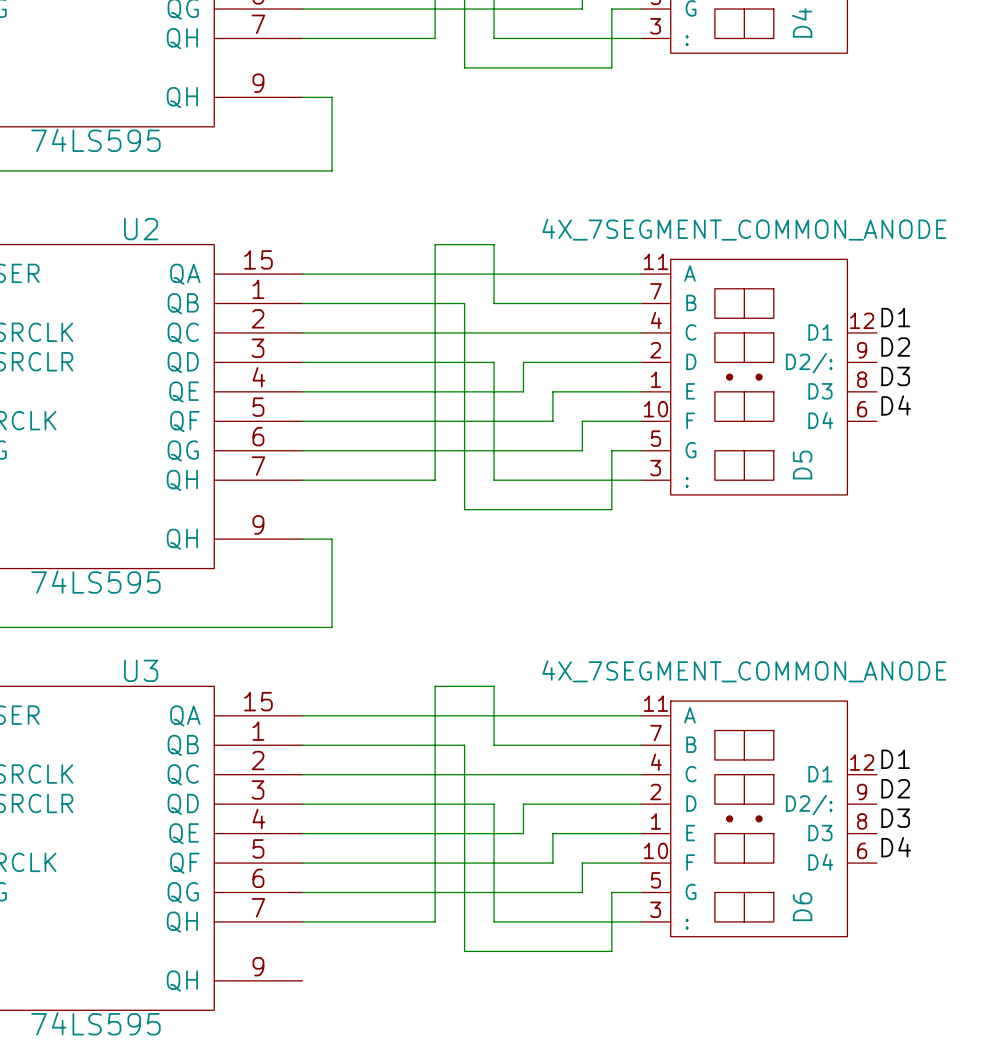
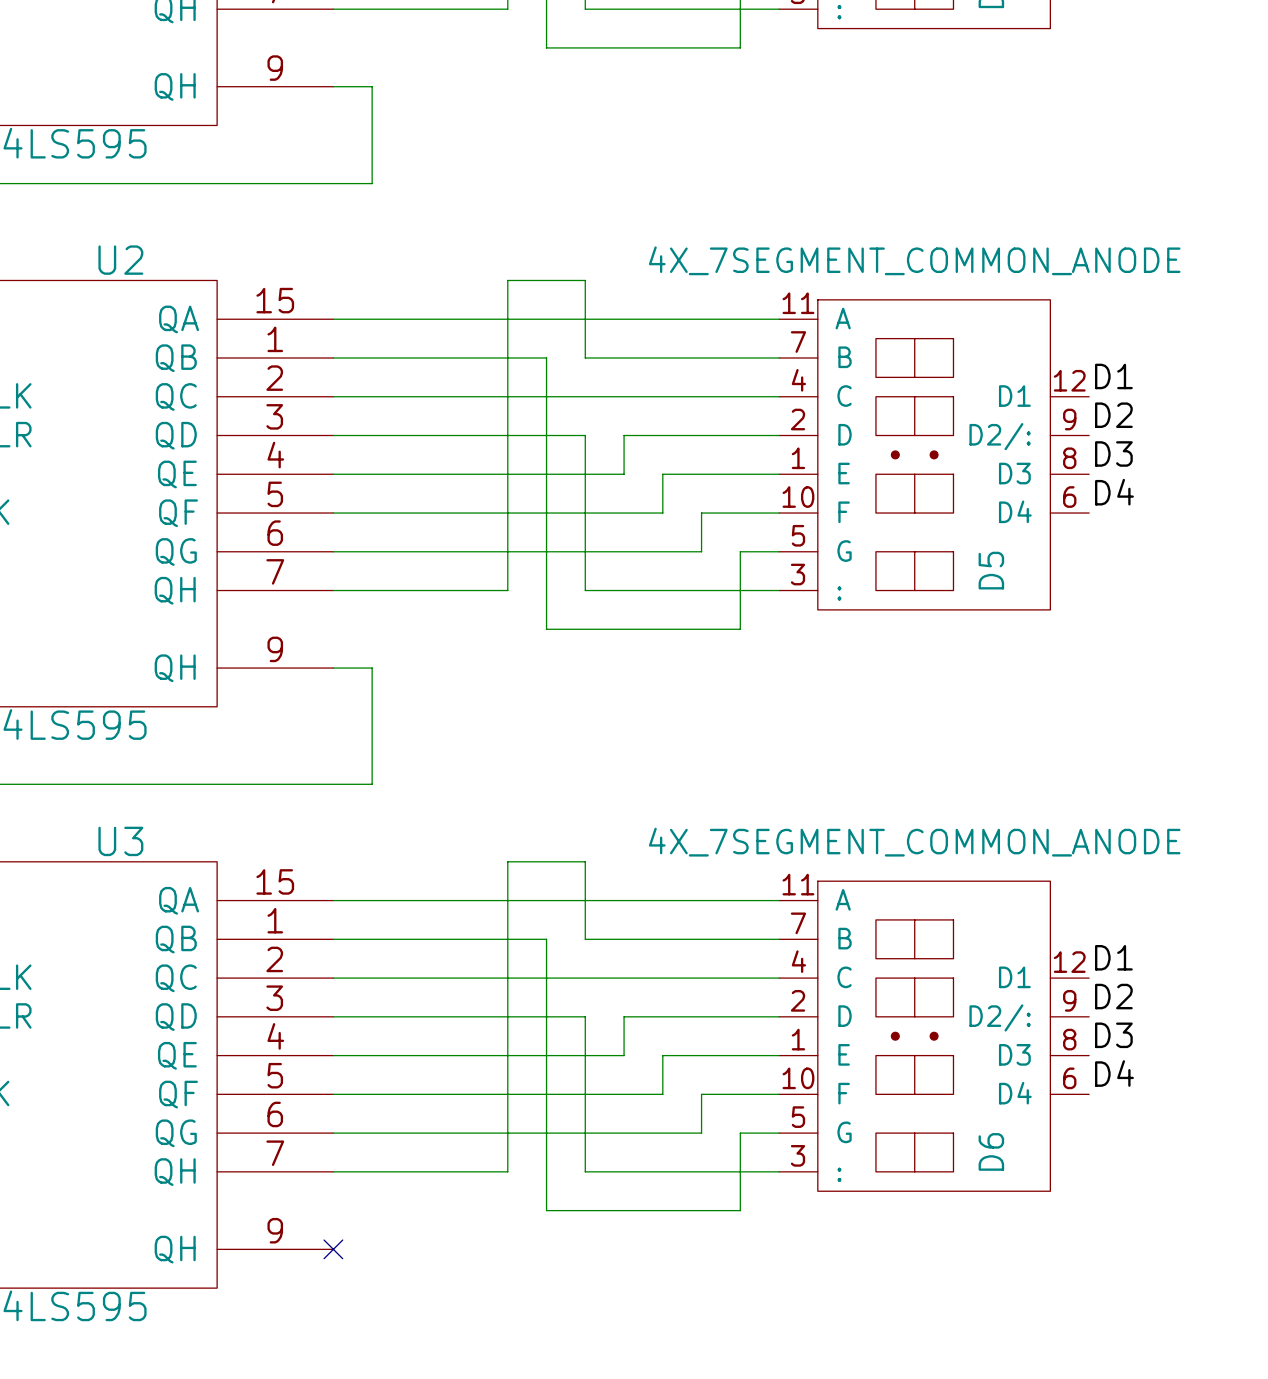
no-connect mark: none -> (333, 1249)

